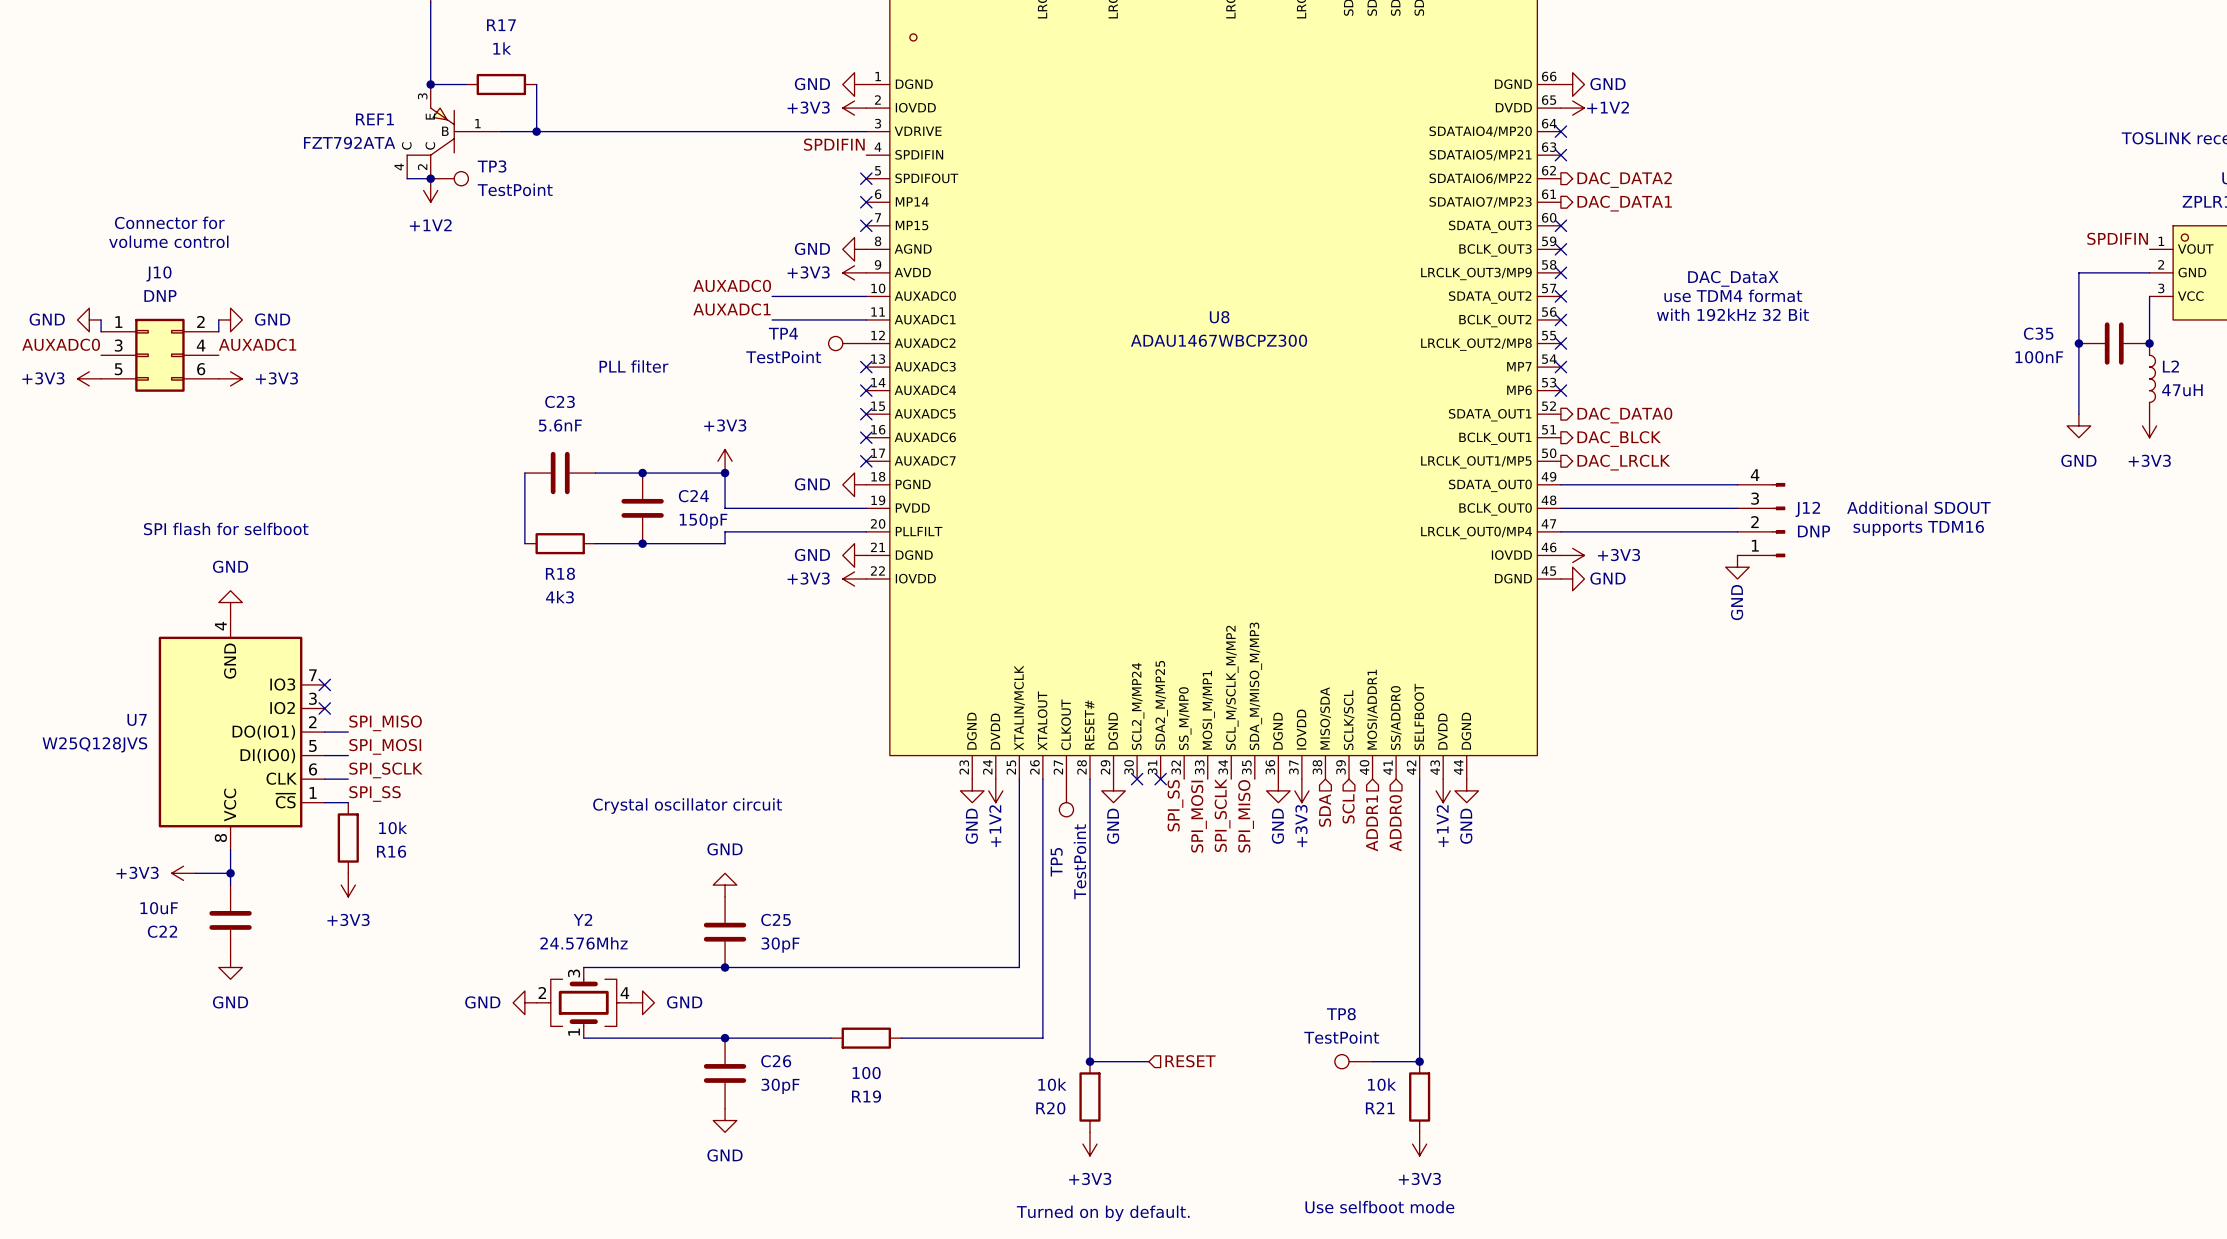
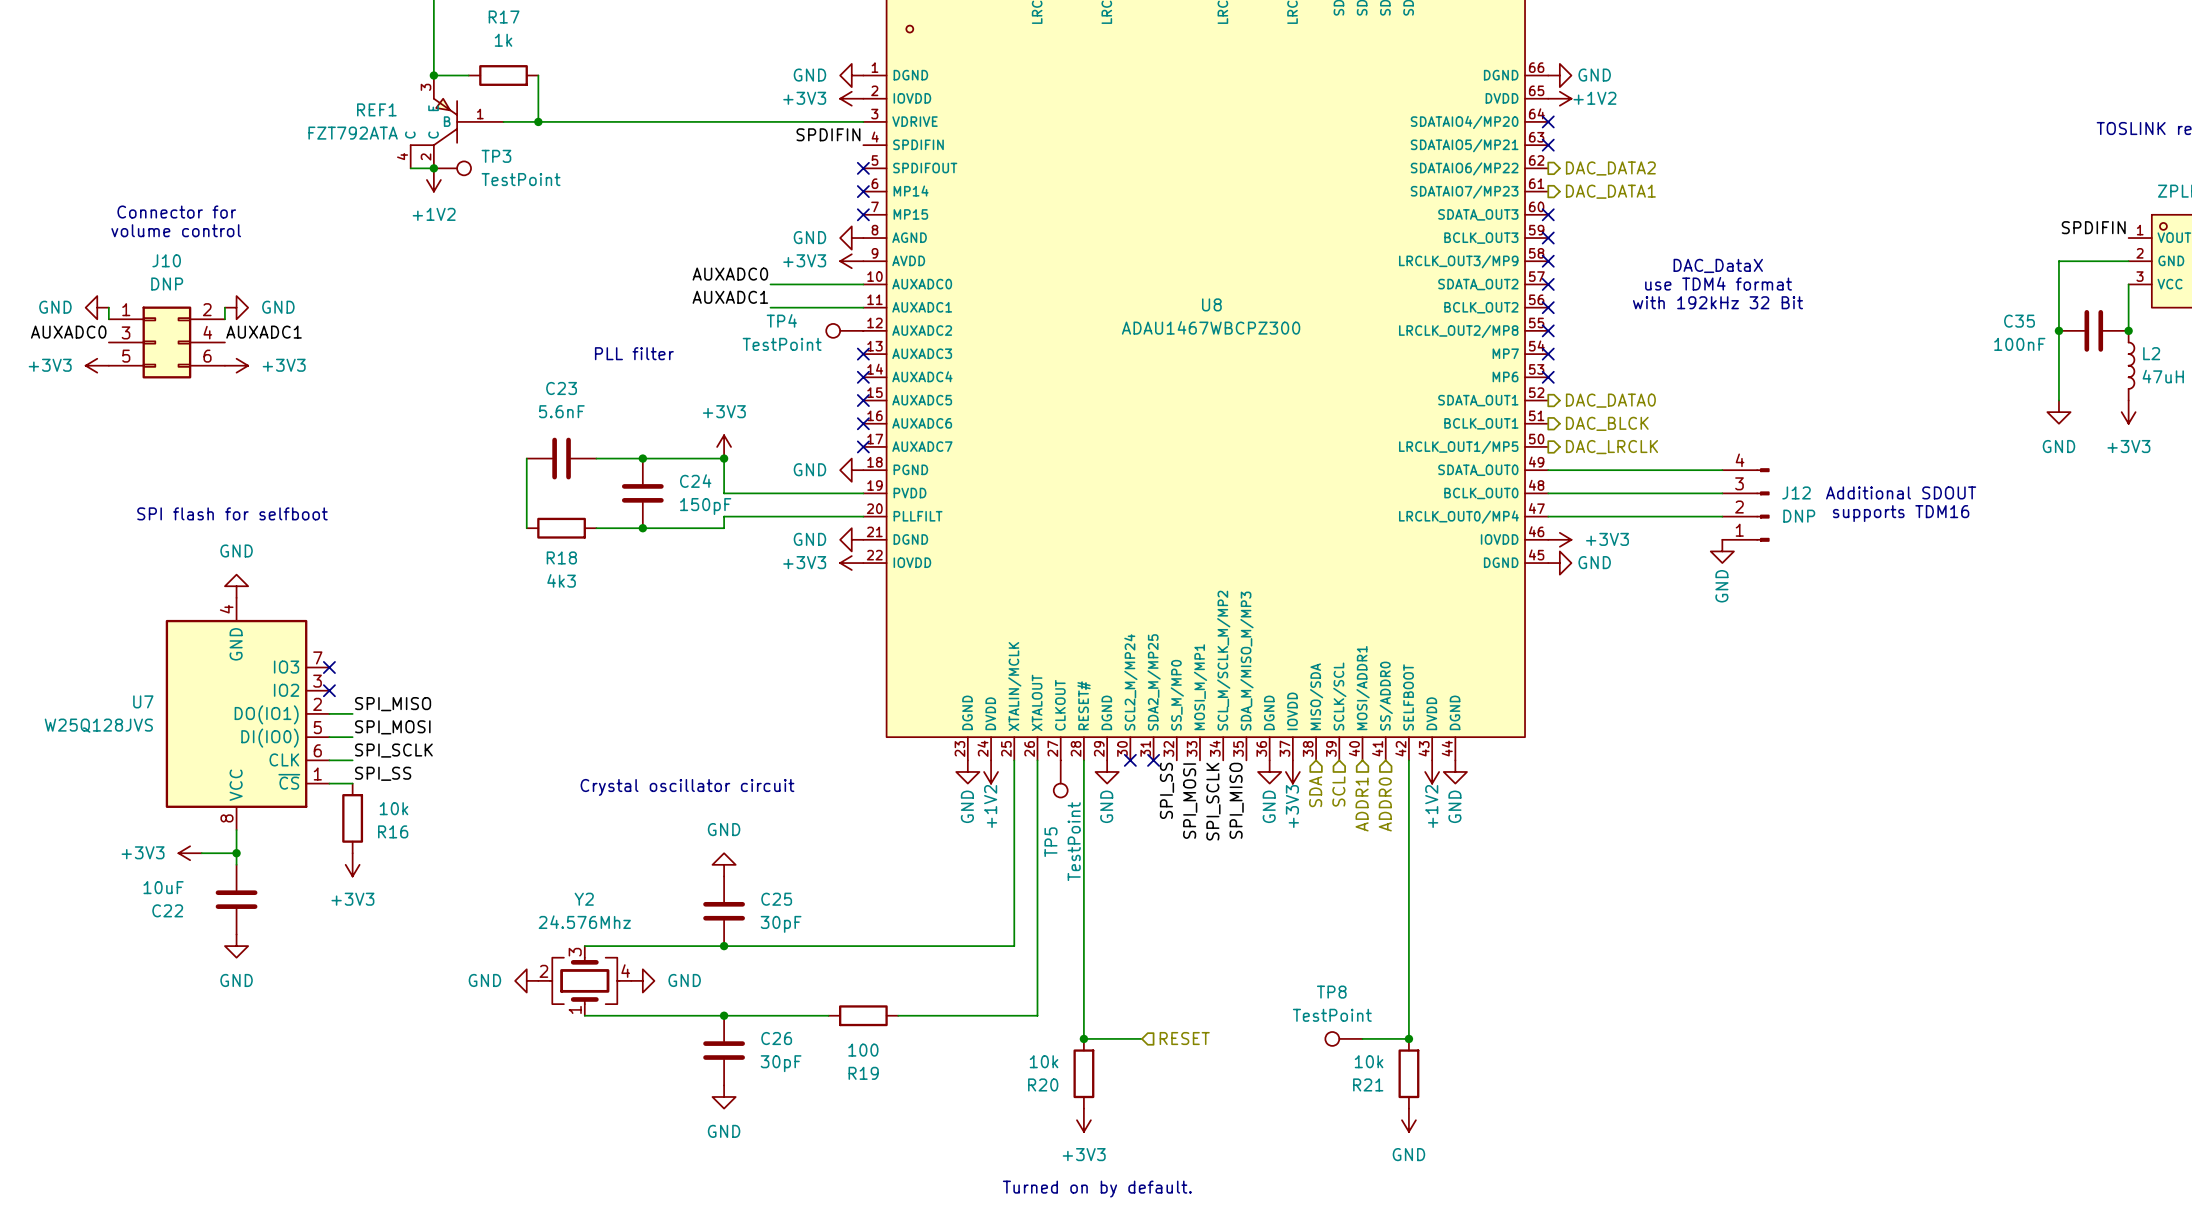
power symbol: +3V3 (1419, 1144) -> GND (1408, 1120)
text: Use selfboot mode (1379, 1207) -> none

